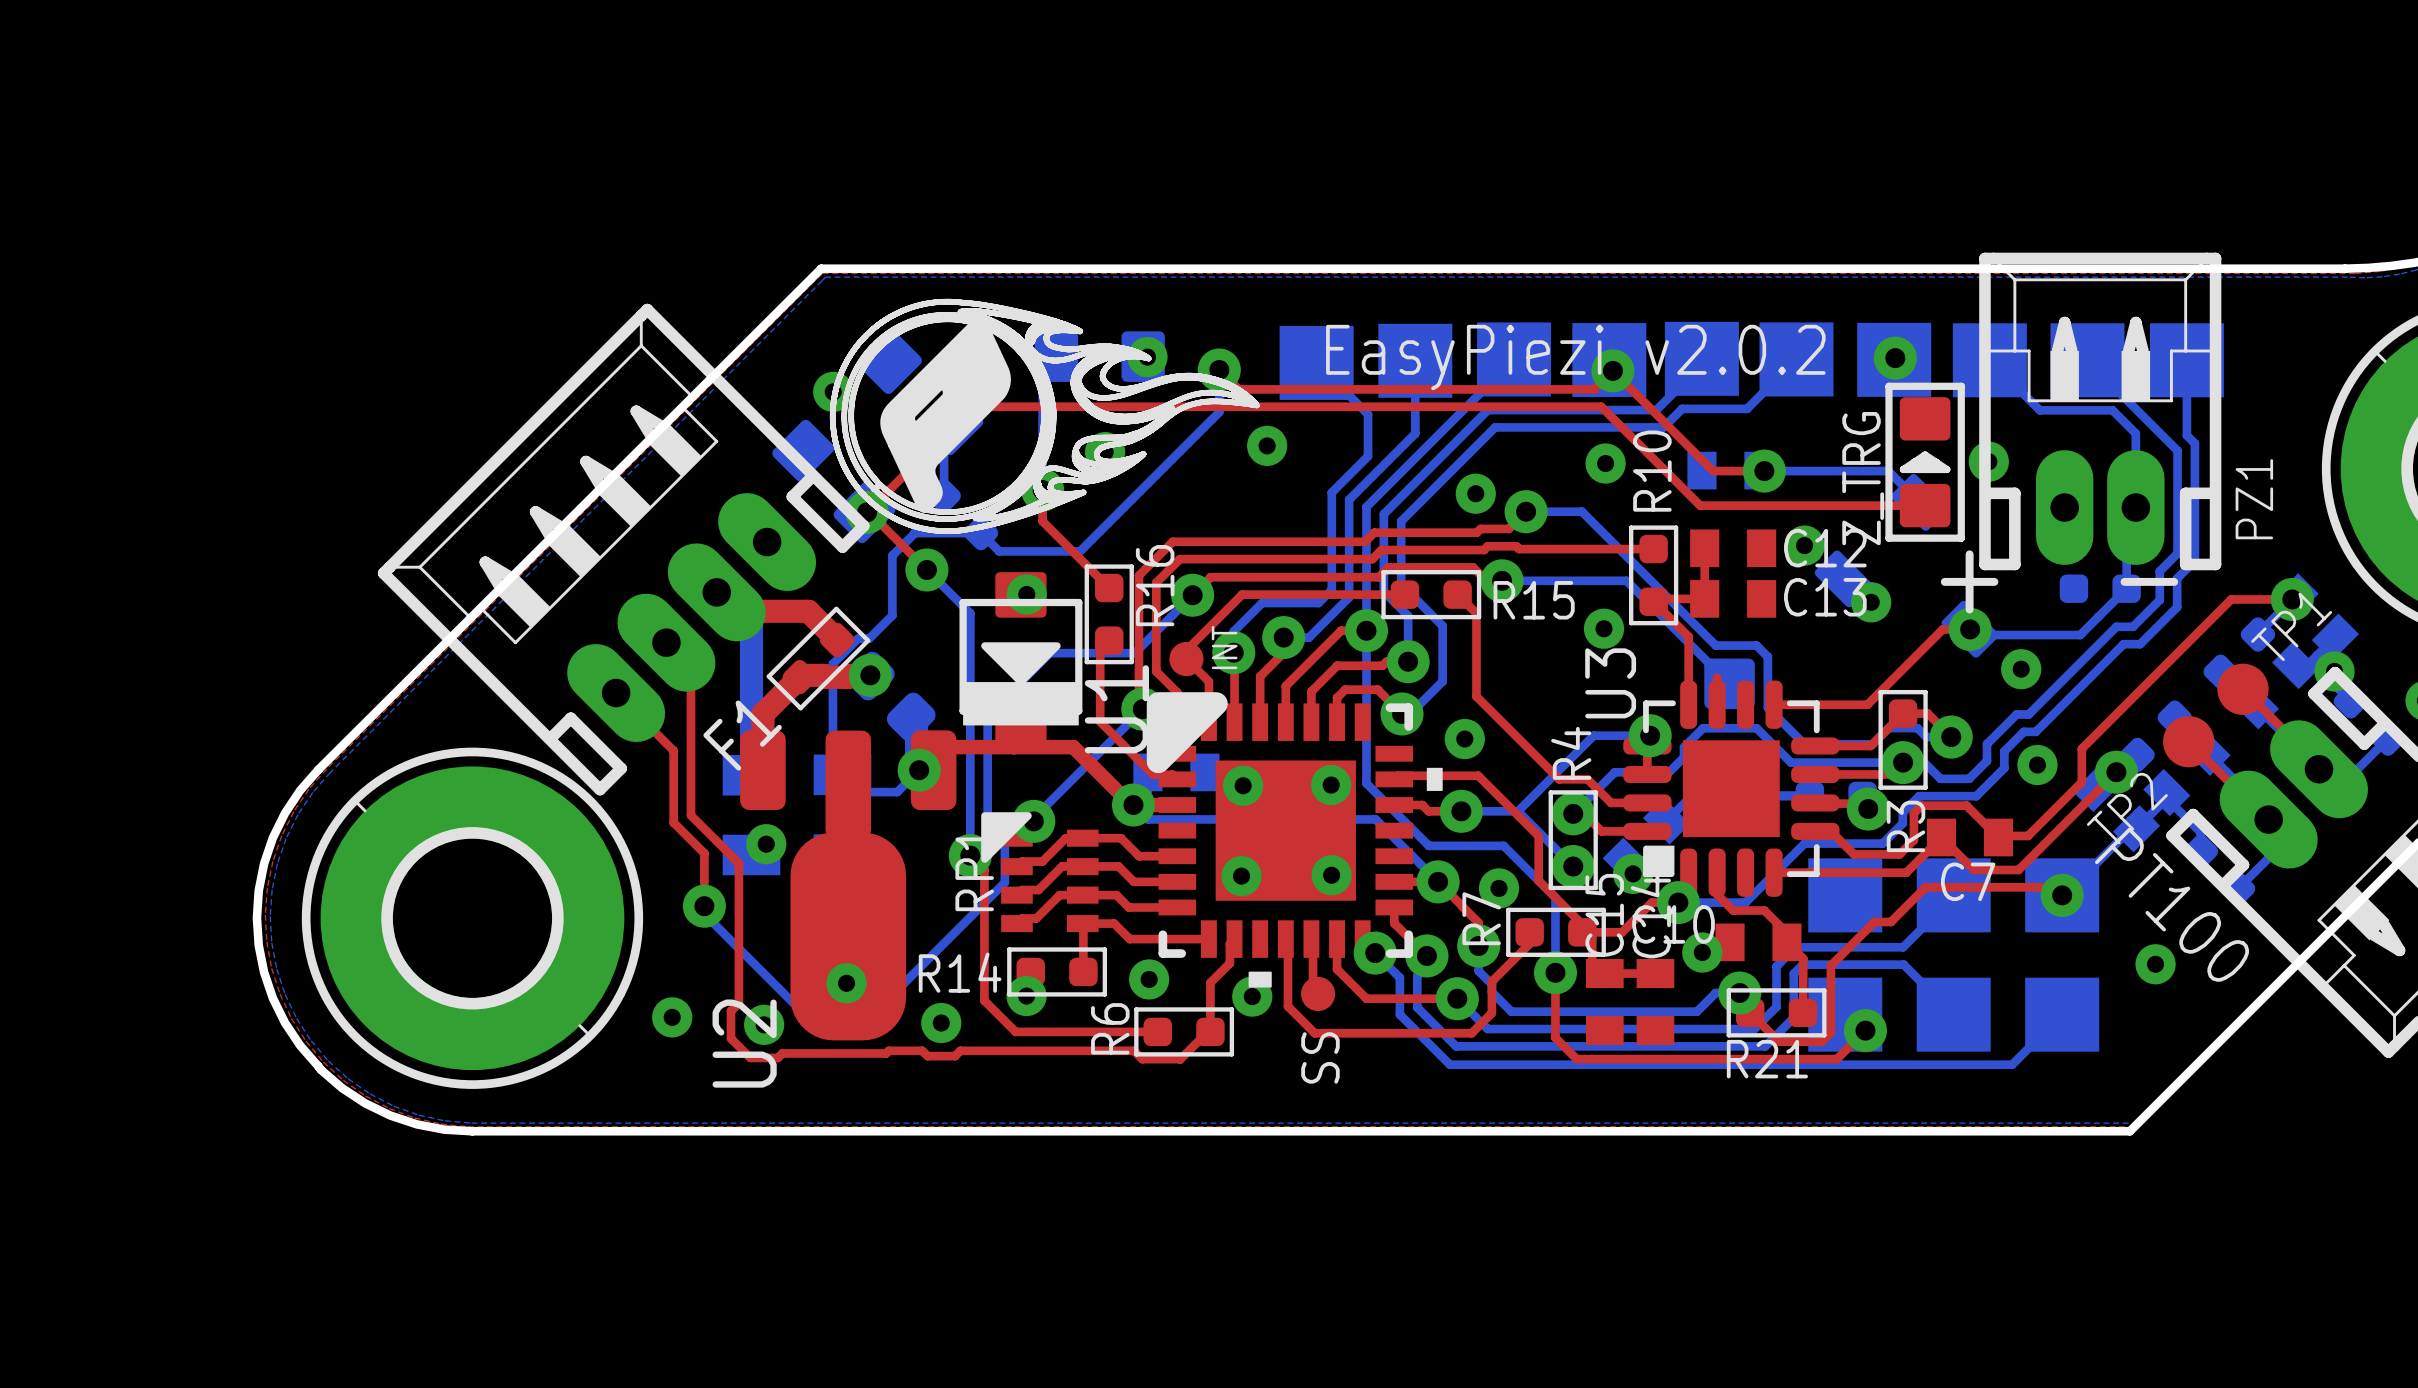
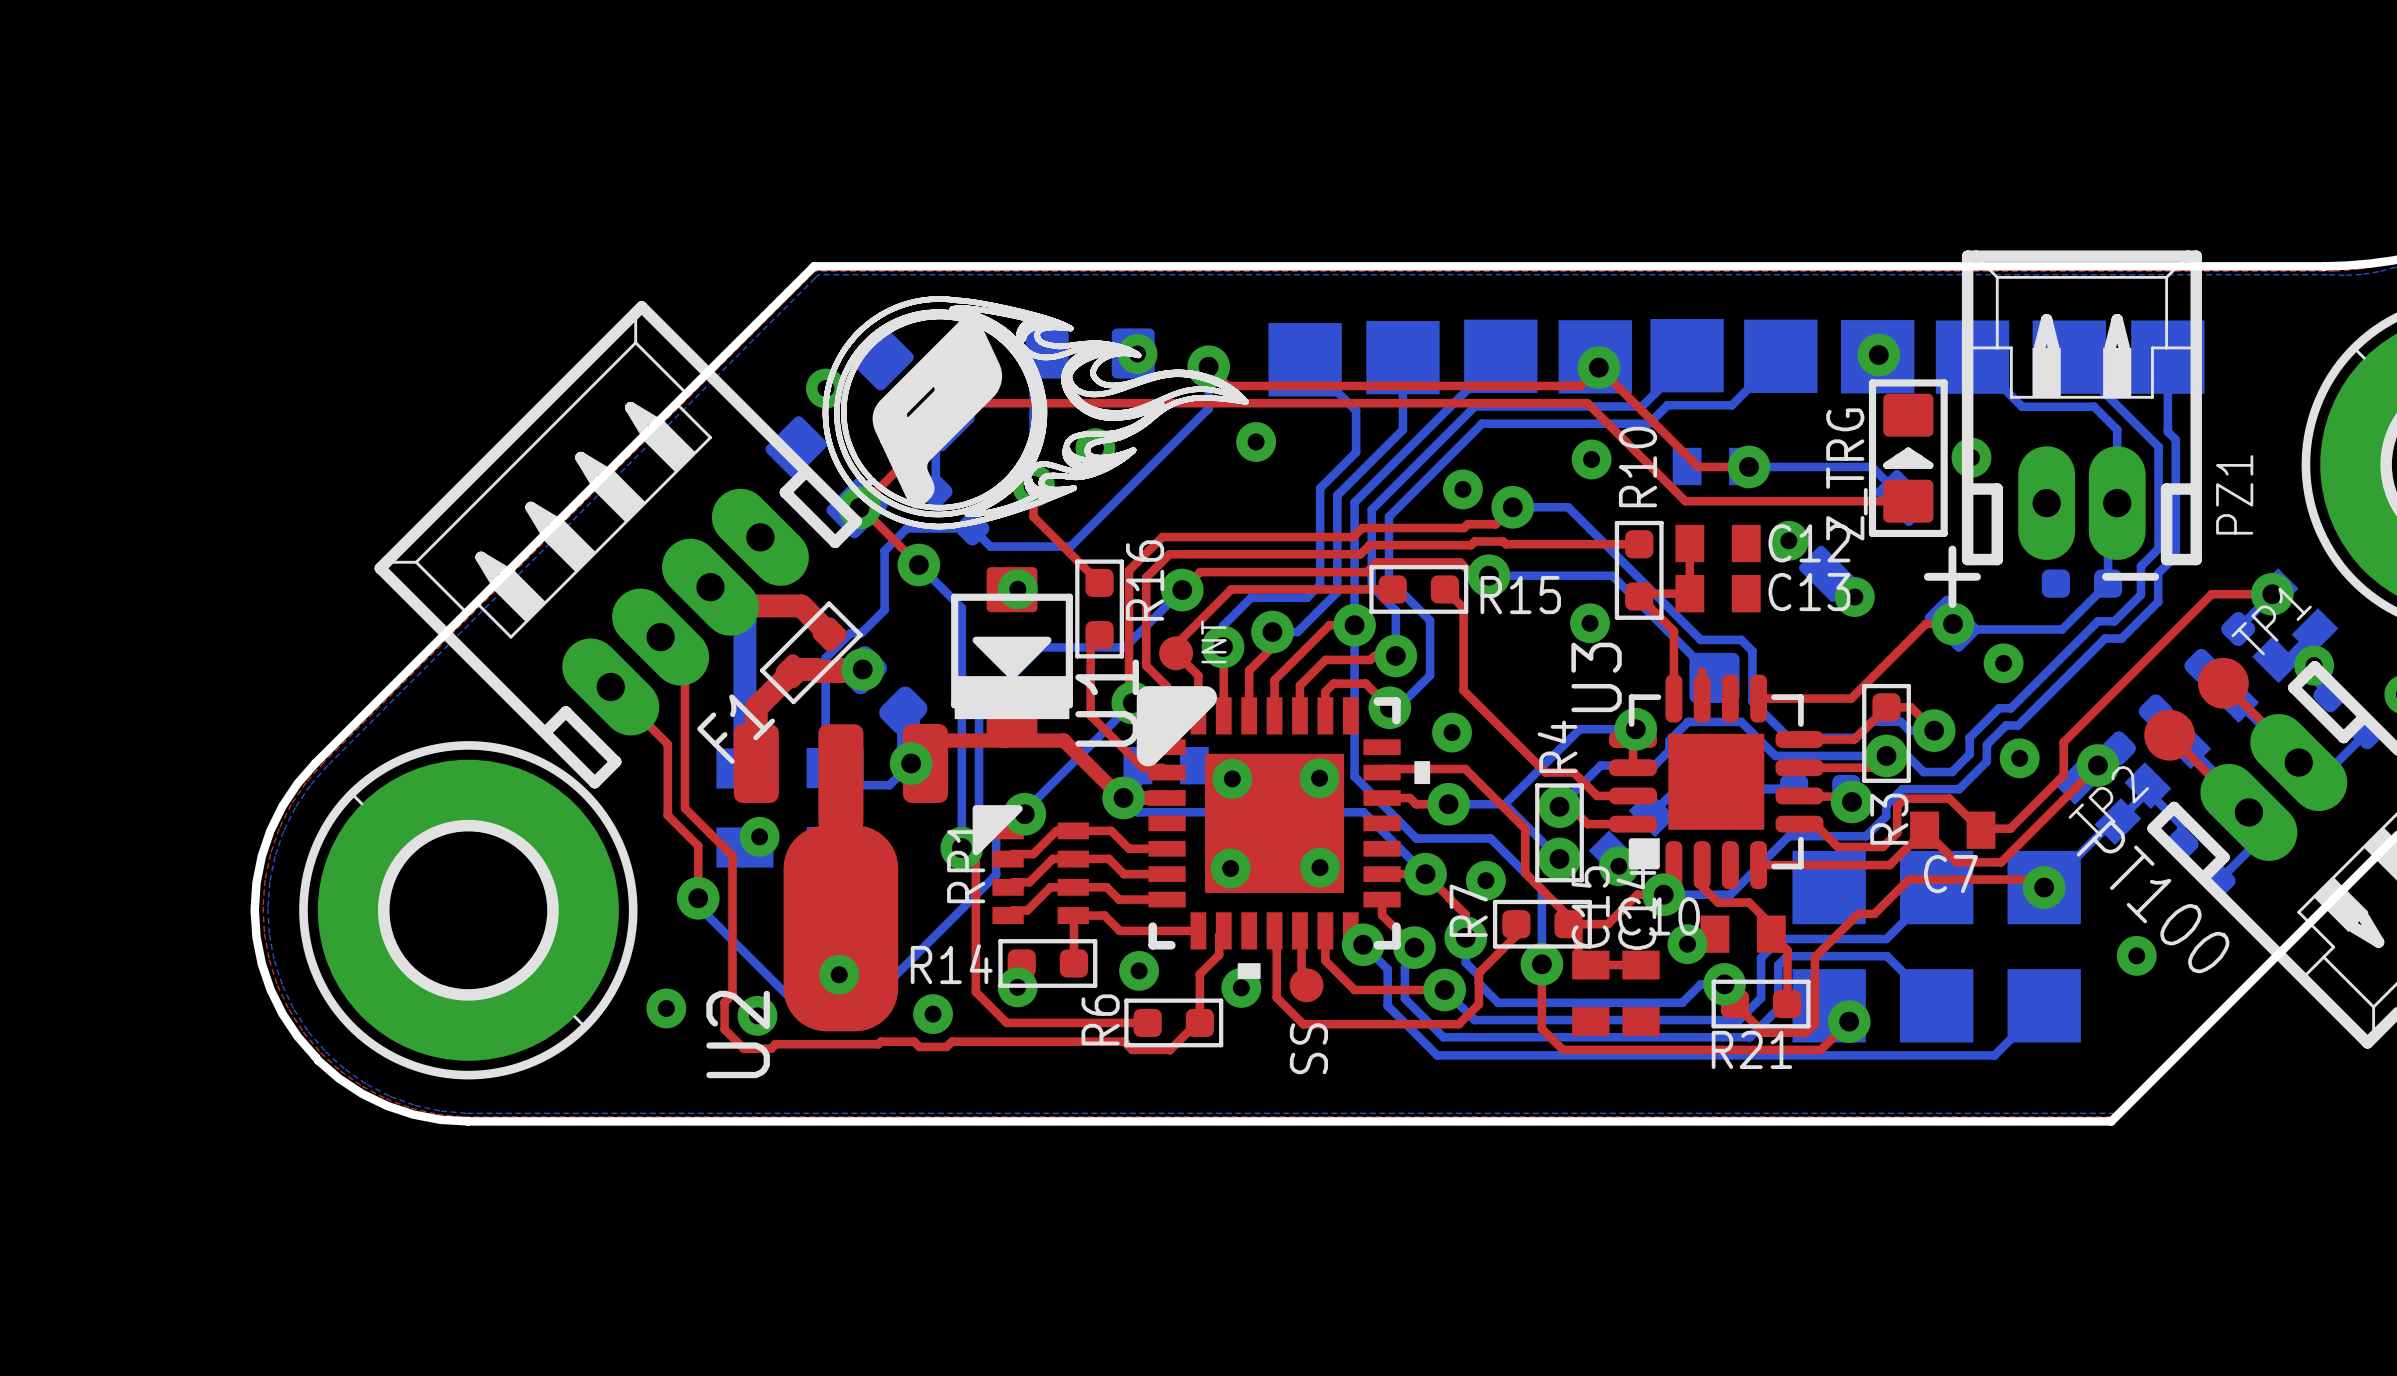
text: EasyPiezi v2.0.2 (1575, 357) -> none

